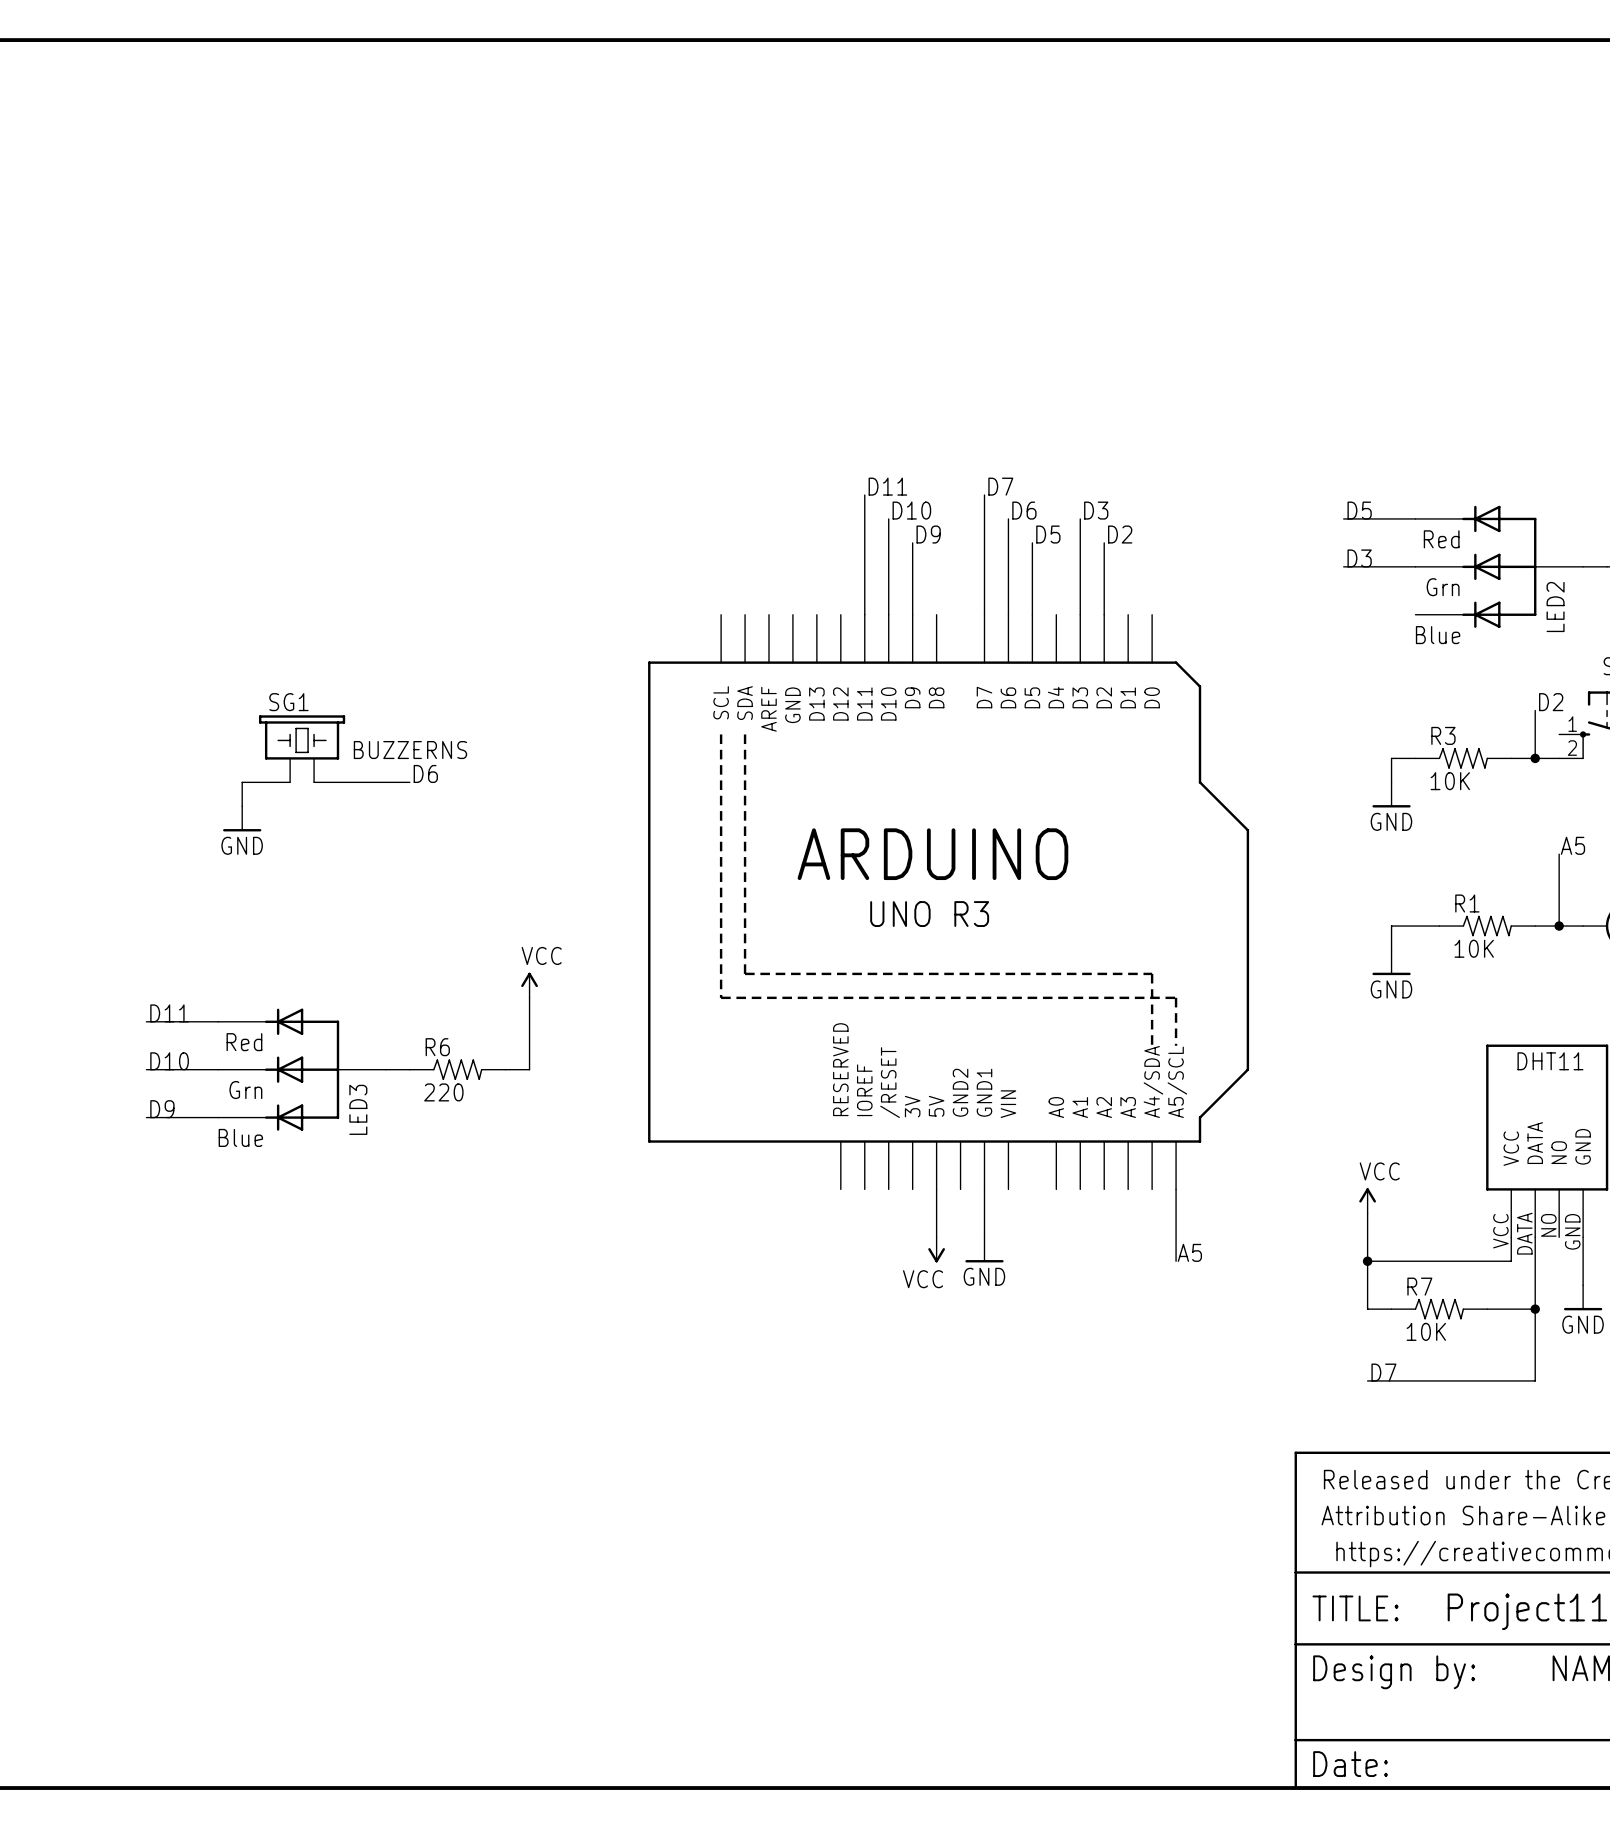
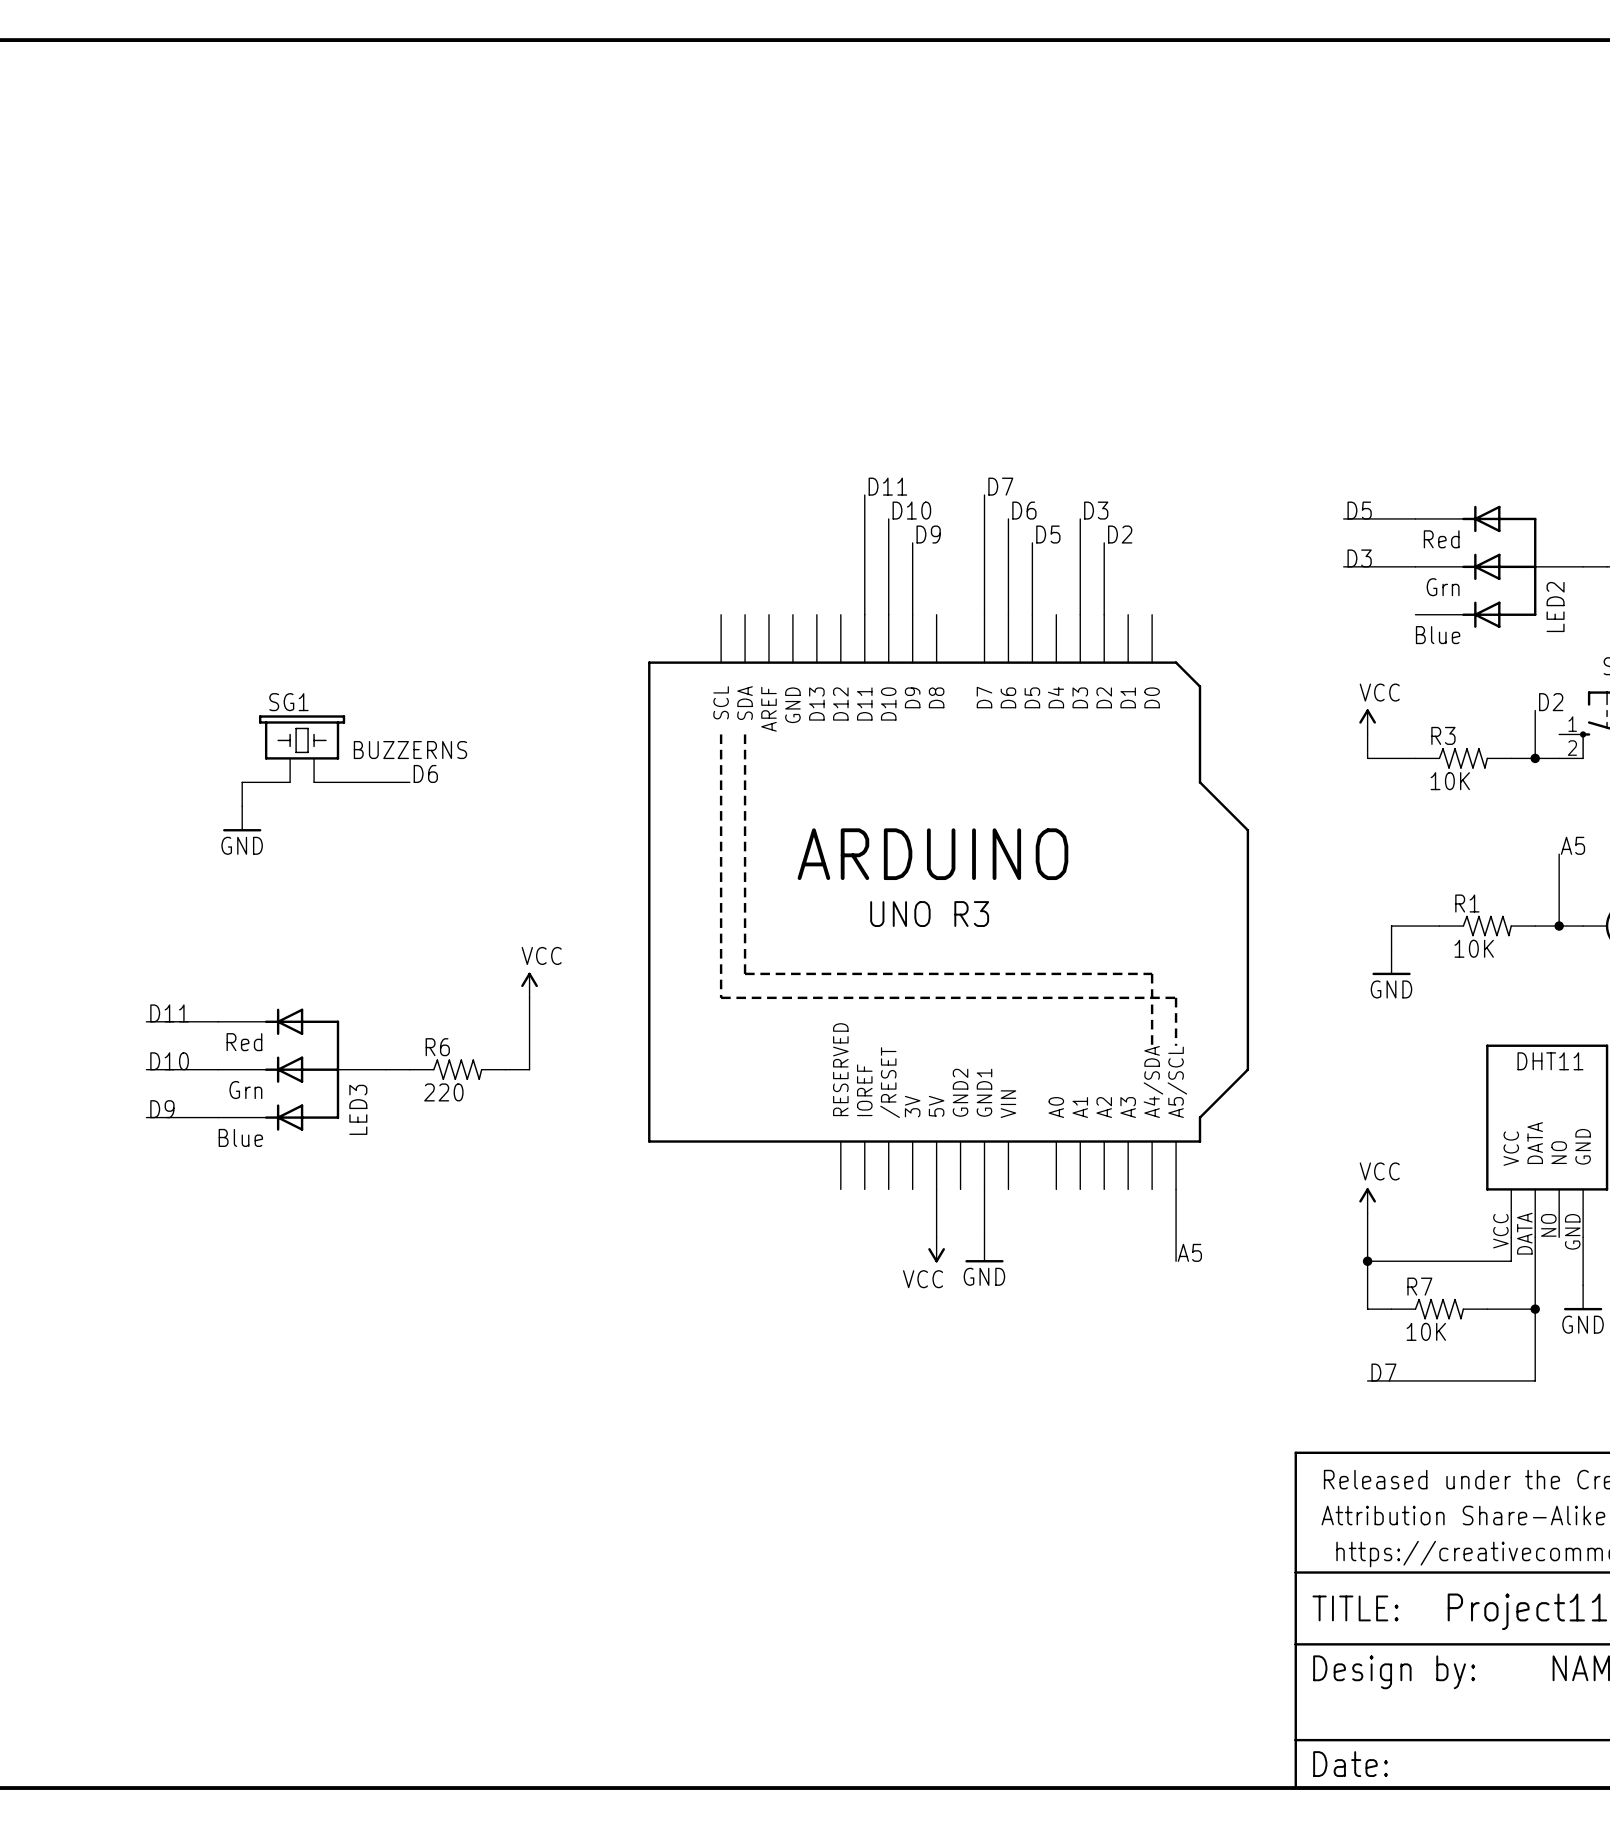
power symbol: none -> VCC (1367, 721)
wire: (1391, 758) (1391, 782) -> (1391, 758) (1367, 758) (1367, 734)
power symbol: GND (1391, 794) -> none

